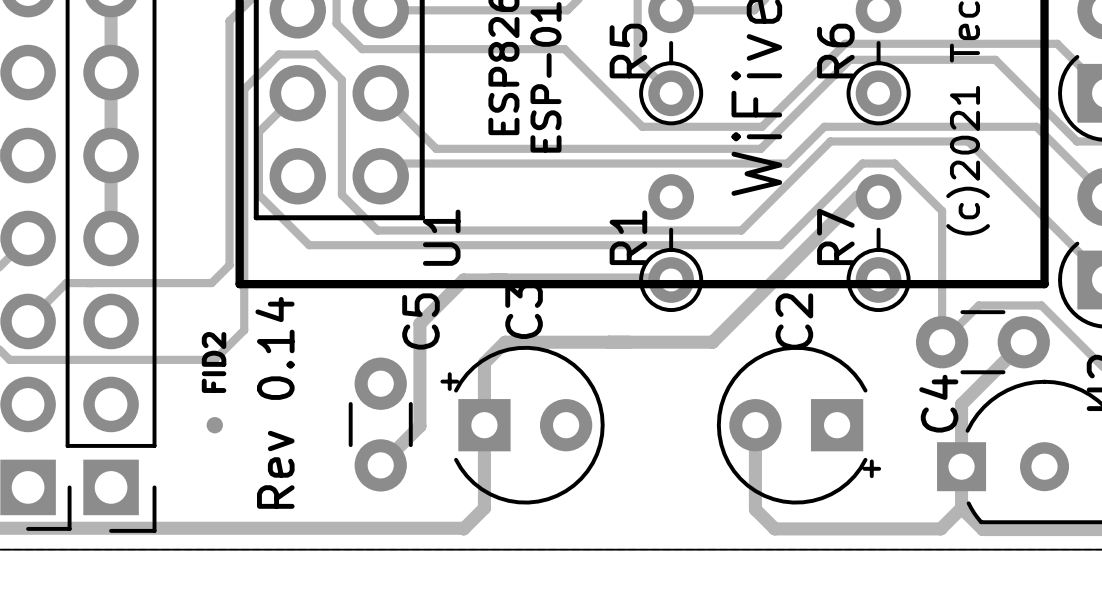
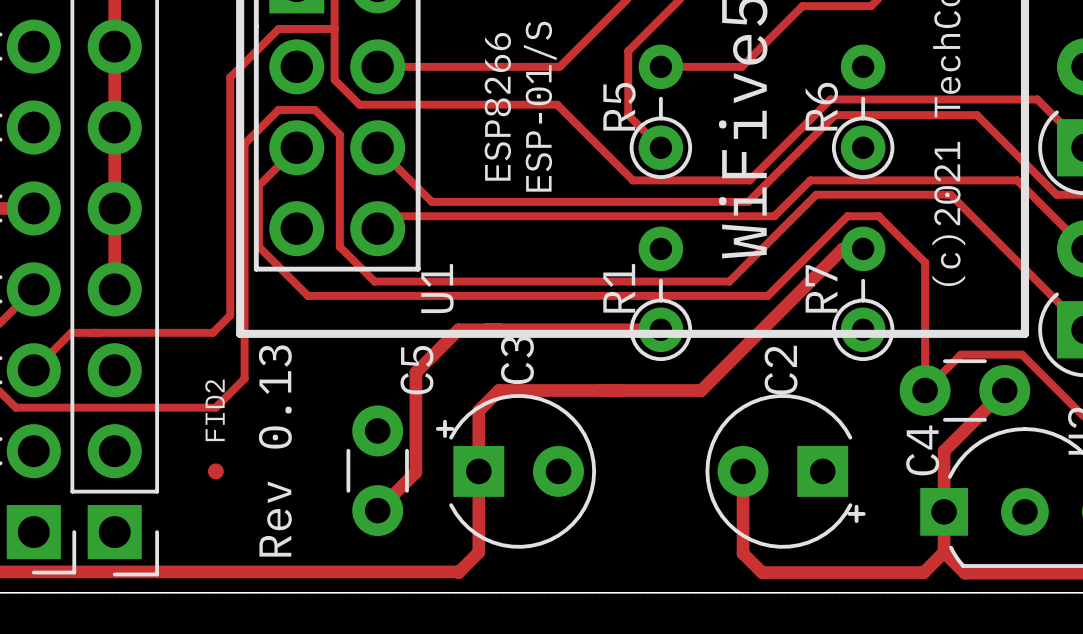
text: Rev 0.14 (275, 402) -> Rev 0.13 (275, 450)

